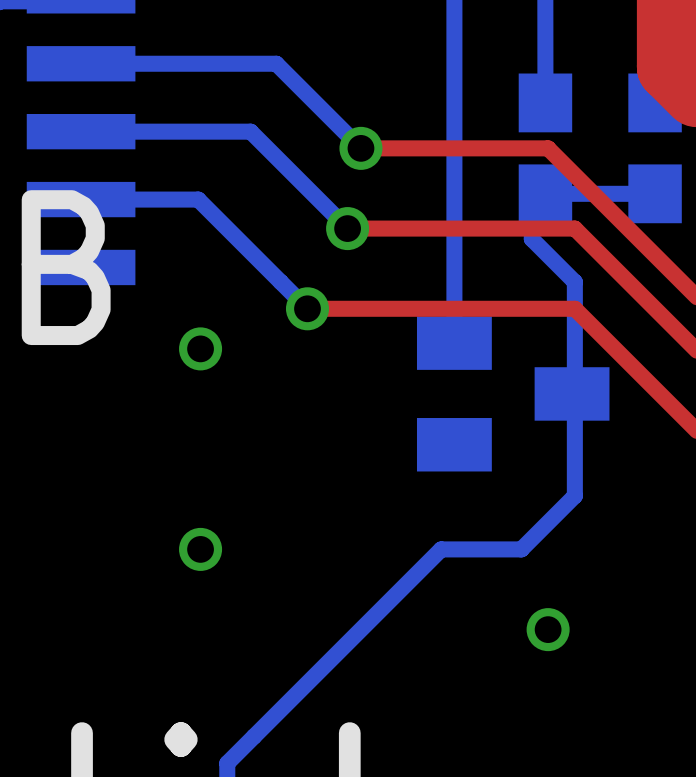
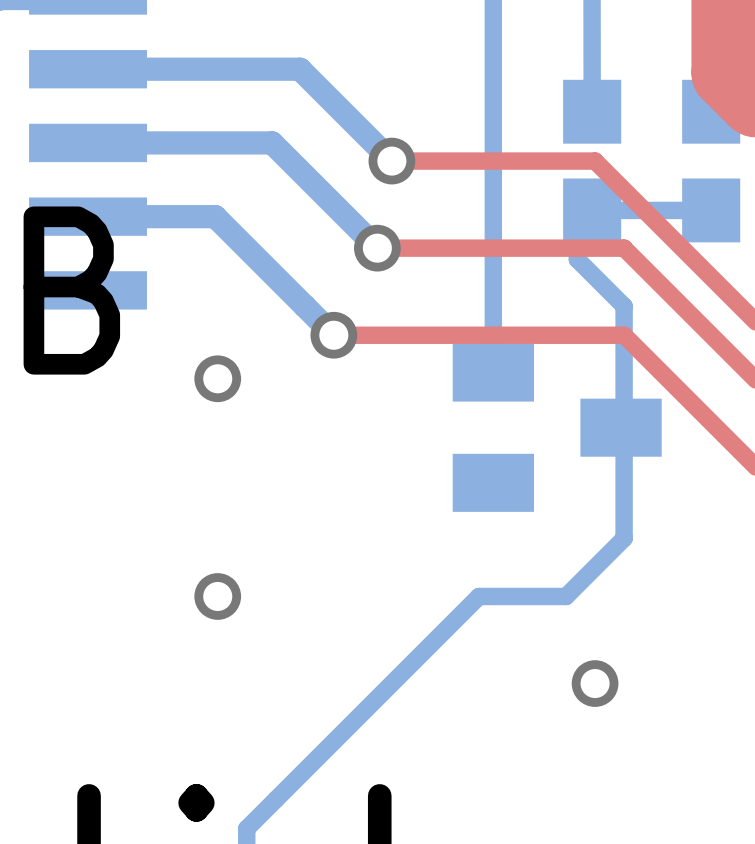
bottom track width: thin (81, 63) (276, 63) (360, 148) -> thick (88, 69) (300, 69) (391, 161)
bottom track width: thin (81, 131) (250, 131) (347, 228) -> thick (88, 142) (272, 142) (377, 248)
bottom track width: thin (81, 199) (198, 199) (307, 308) -> thick (88, 216) (215, 216) (333, 335)

